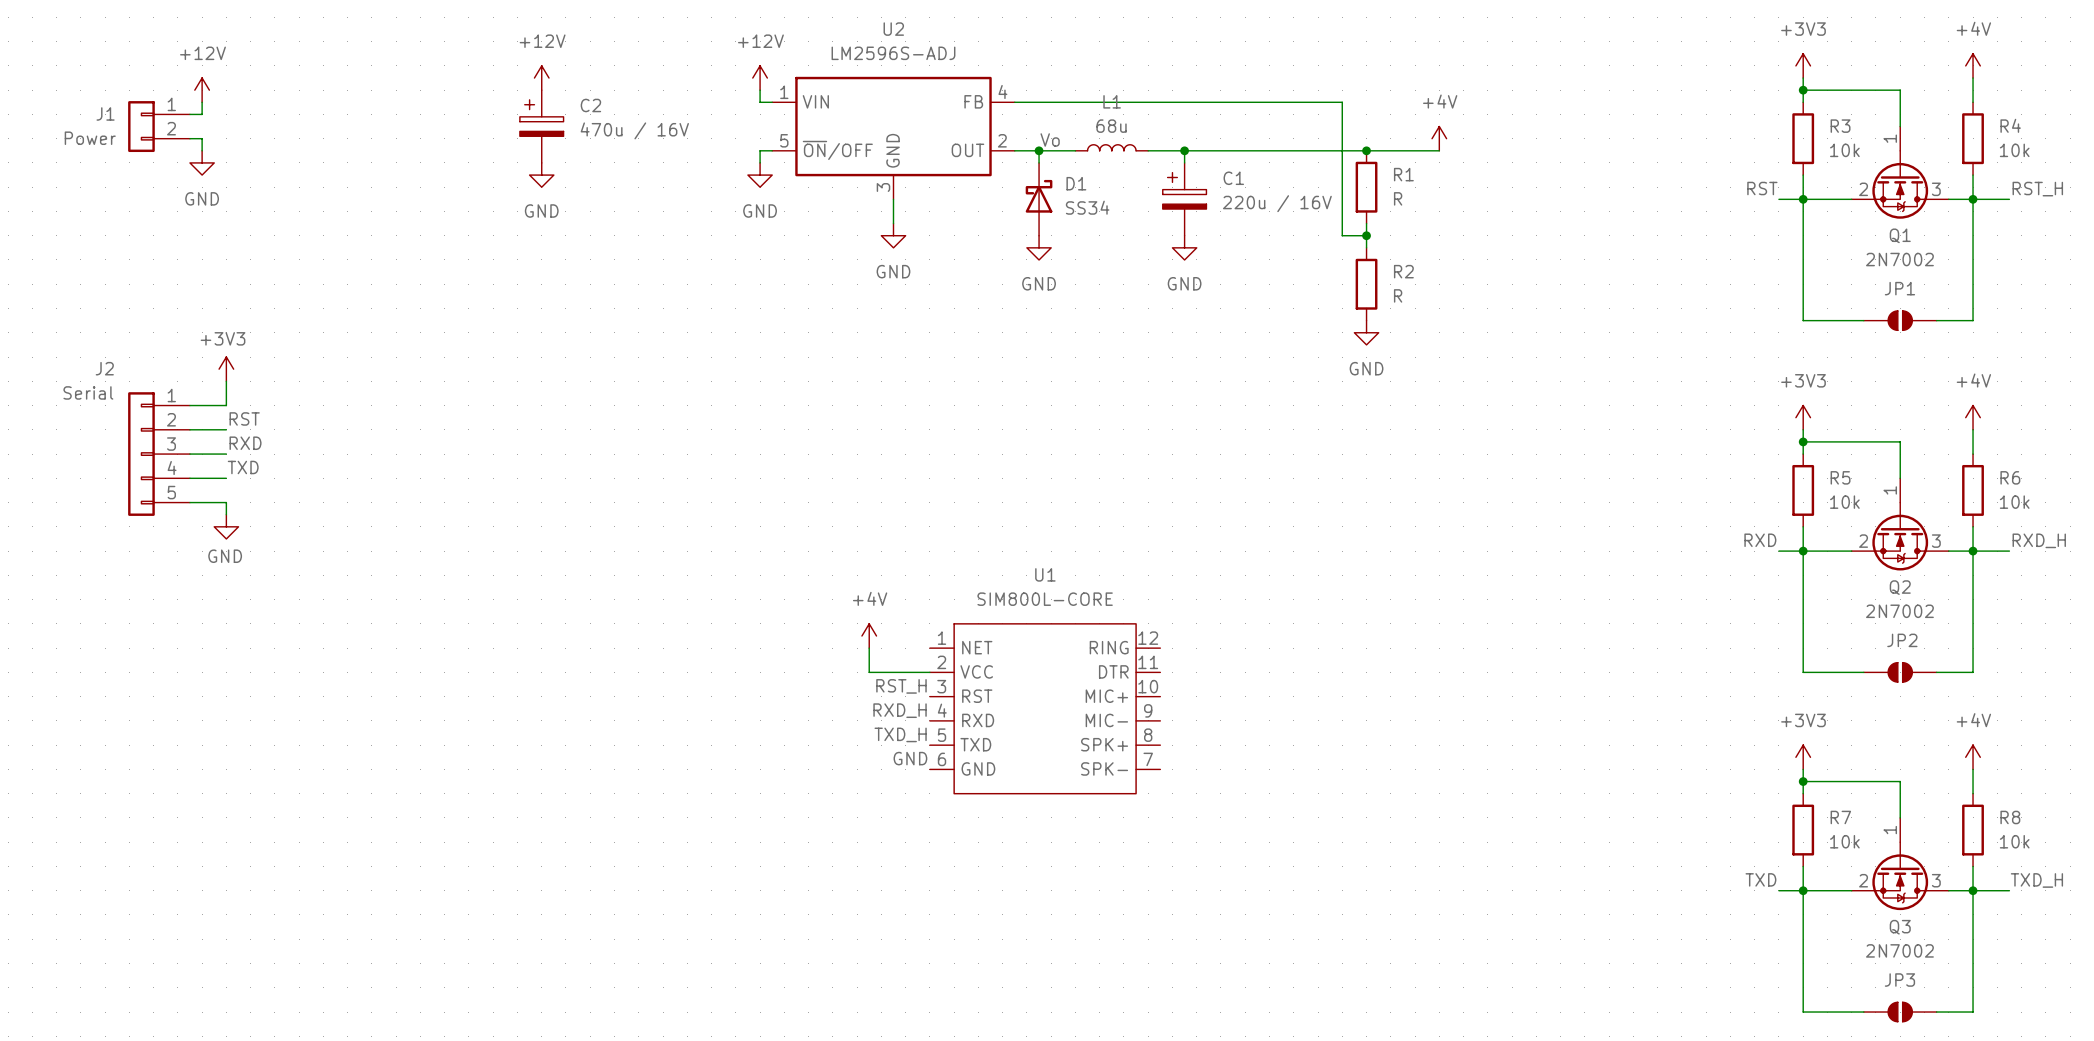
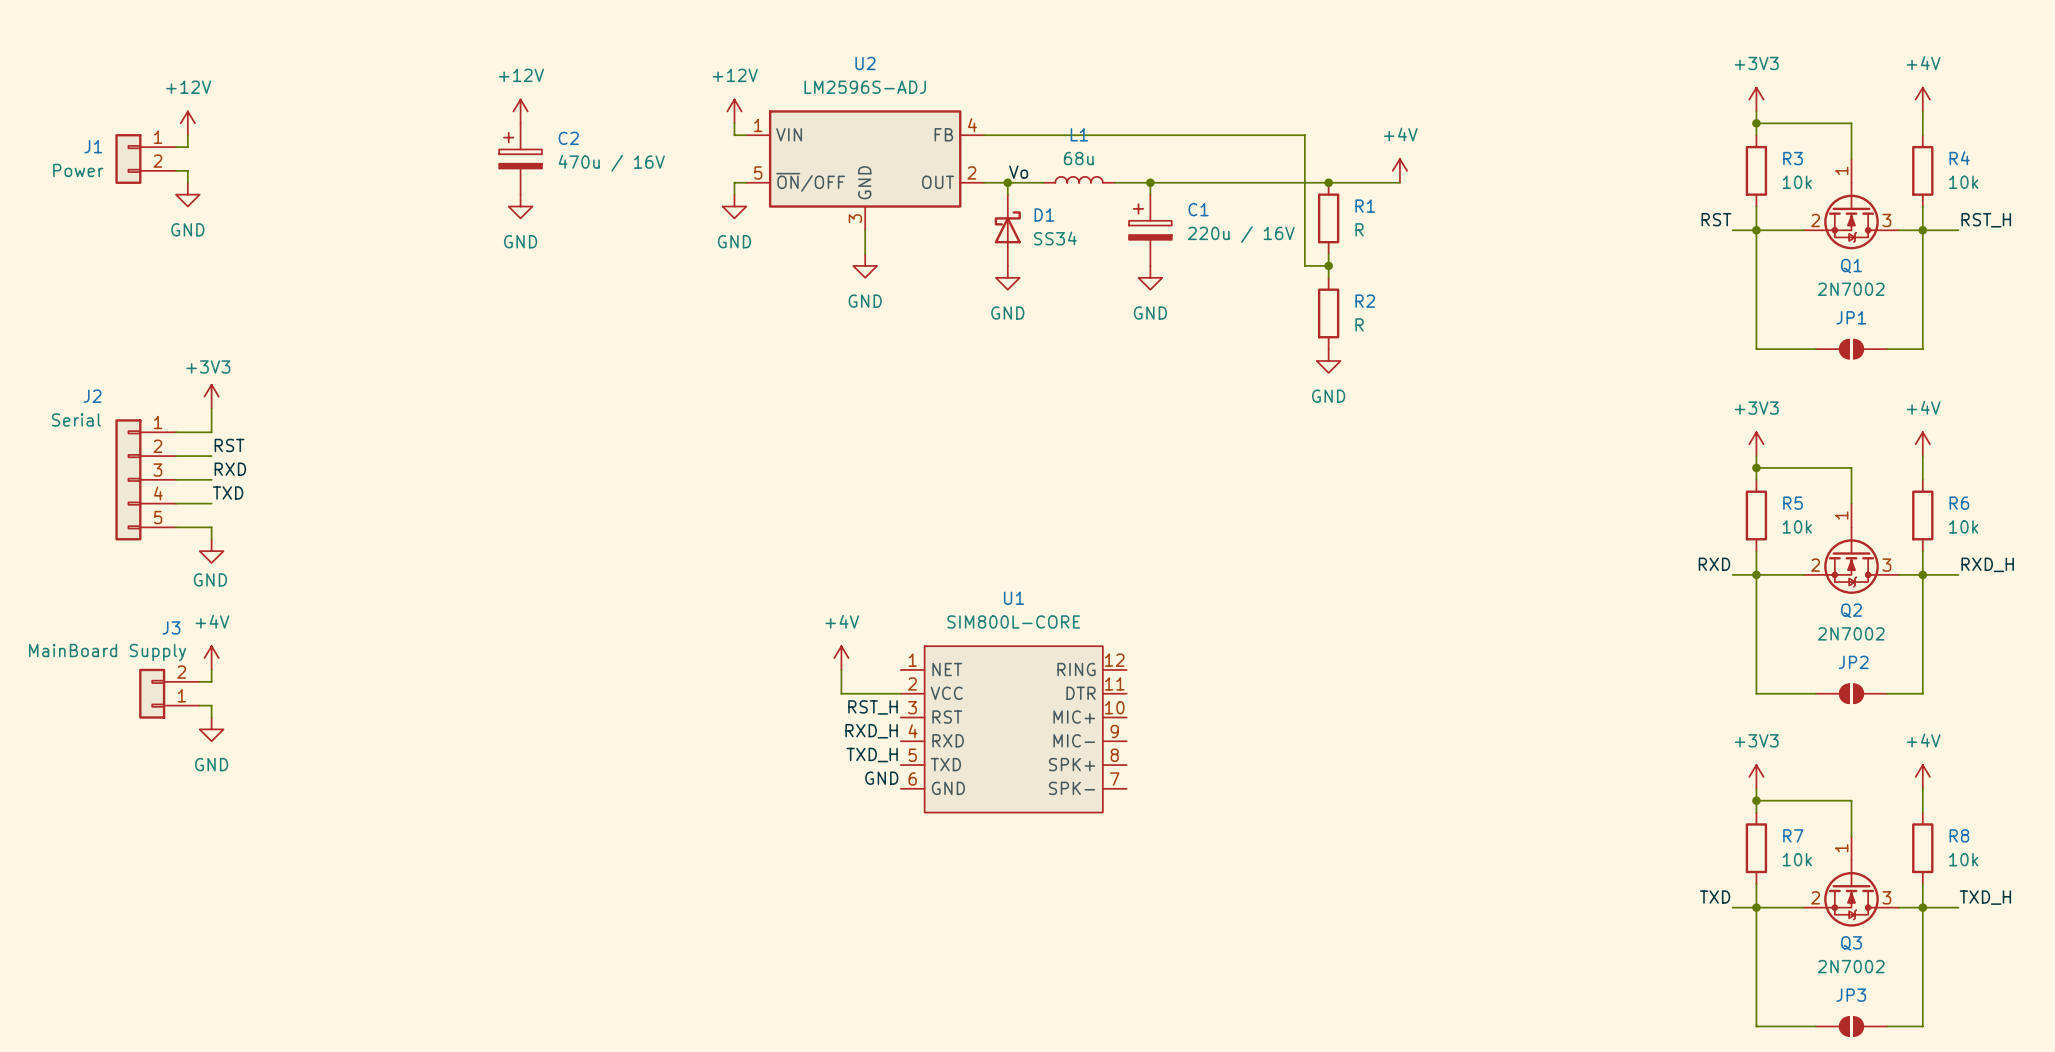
power symbol: none -> +4V (211, 658)
wire: none -> (211, 669) (211, 681) (199, 681)
J3: none -> MainBoard Supply (169, 693)
wire: none -> (199, 705) (211, 705) (211, 717)
power symbol: none -> GND (211, 729)

